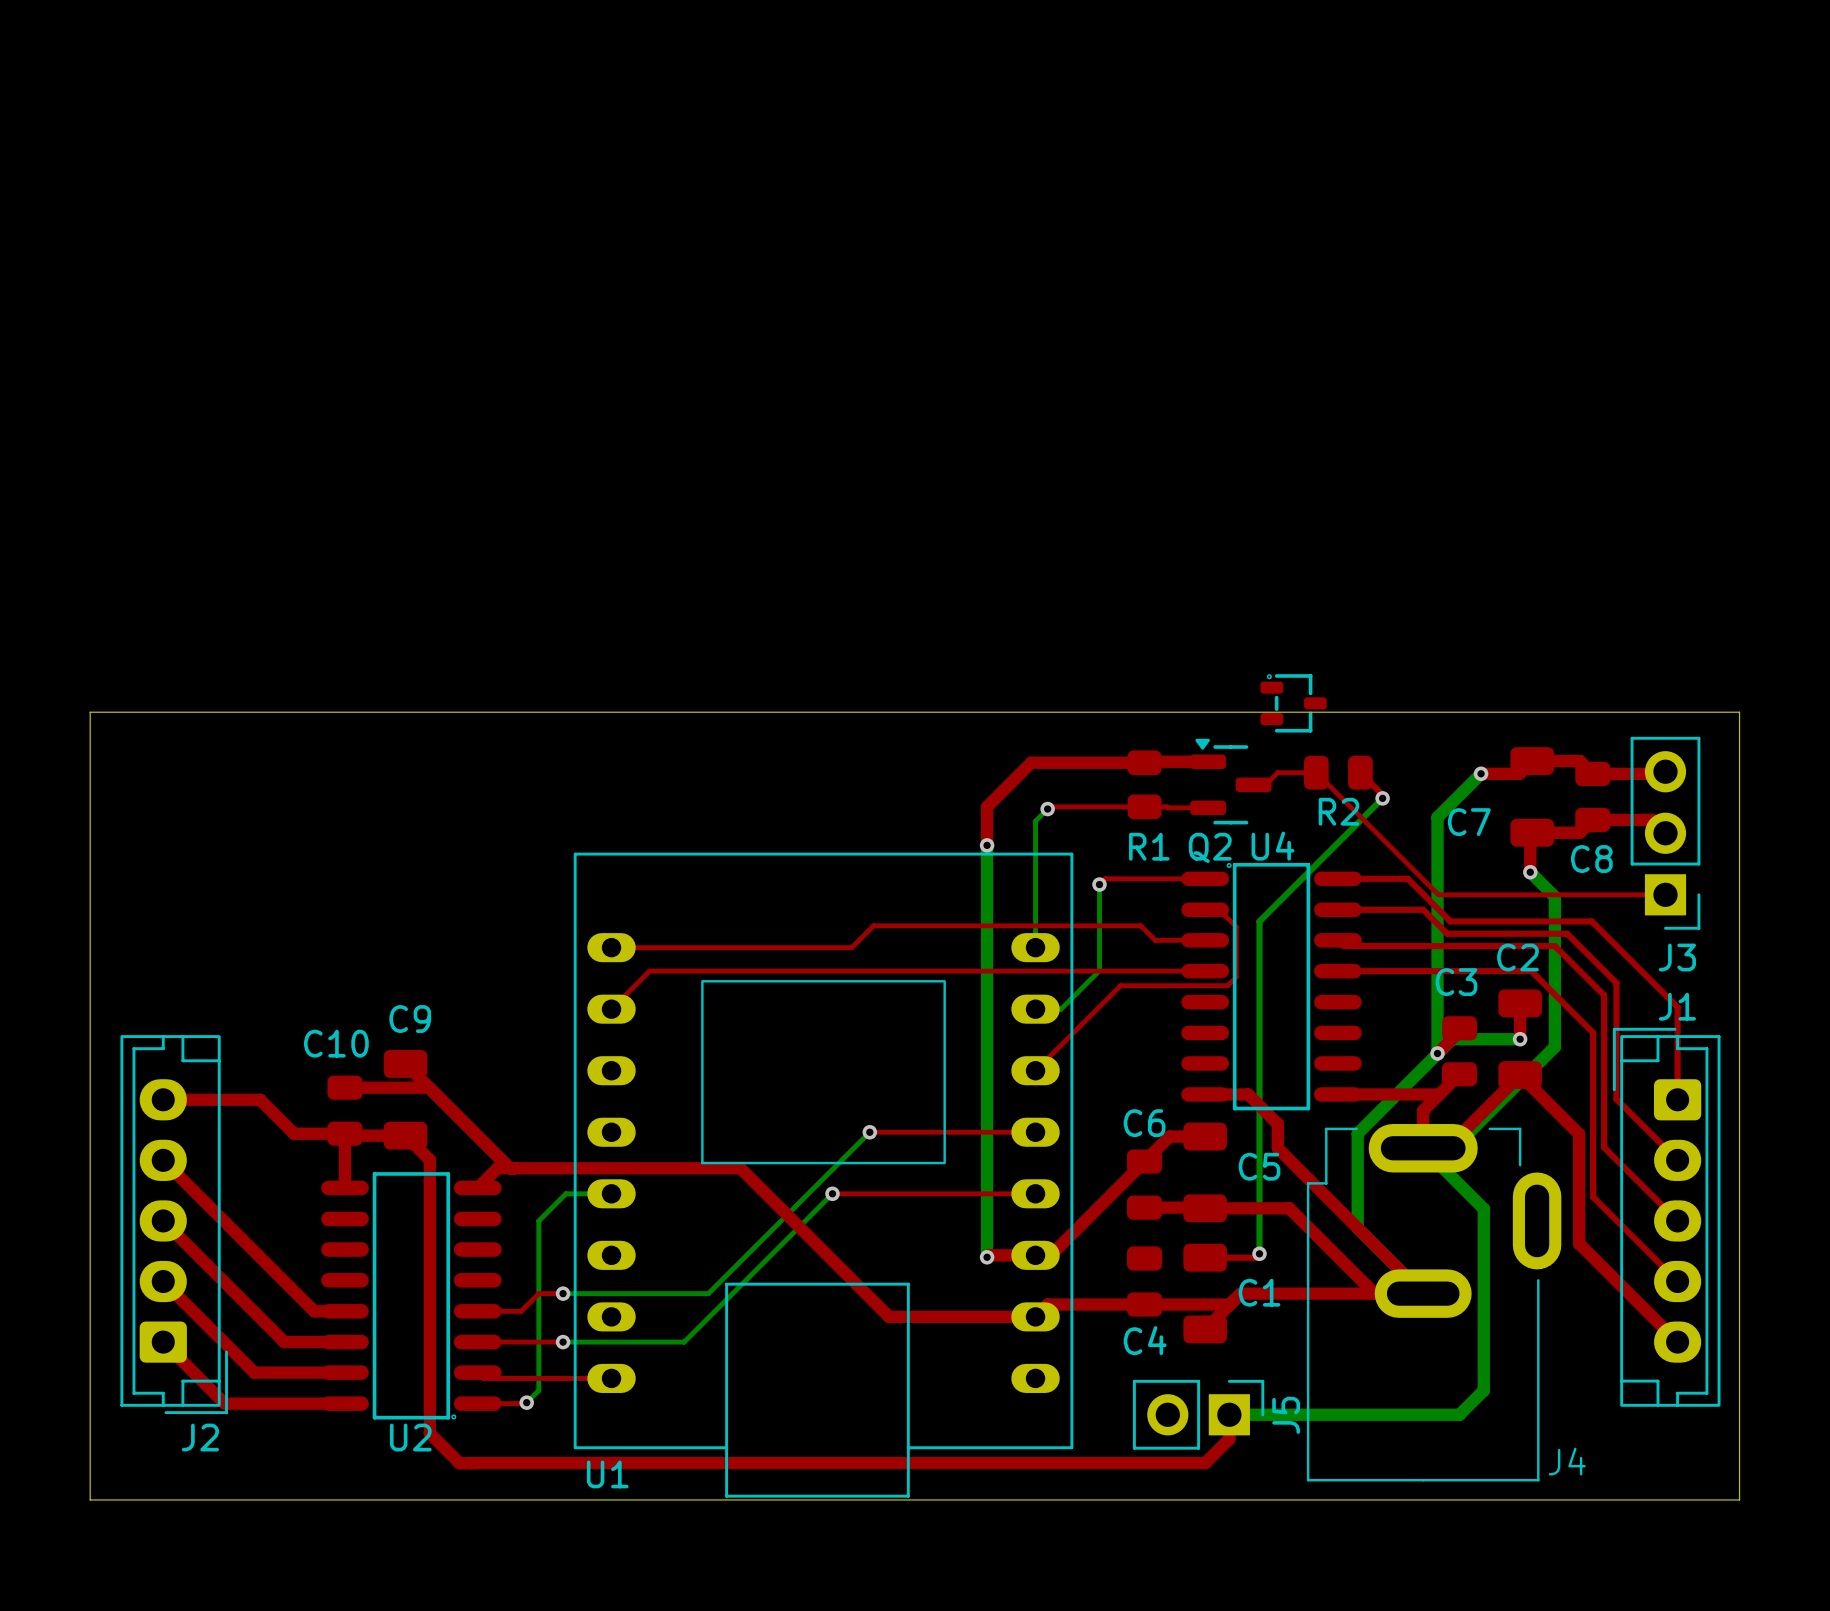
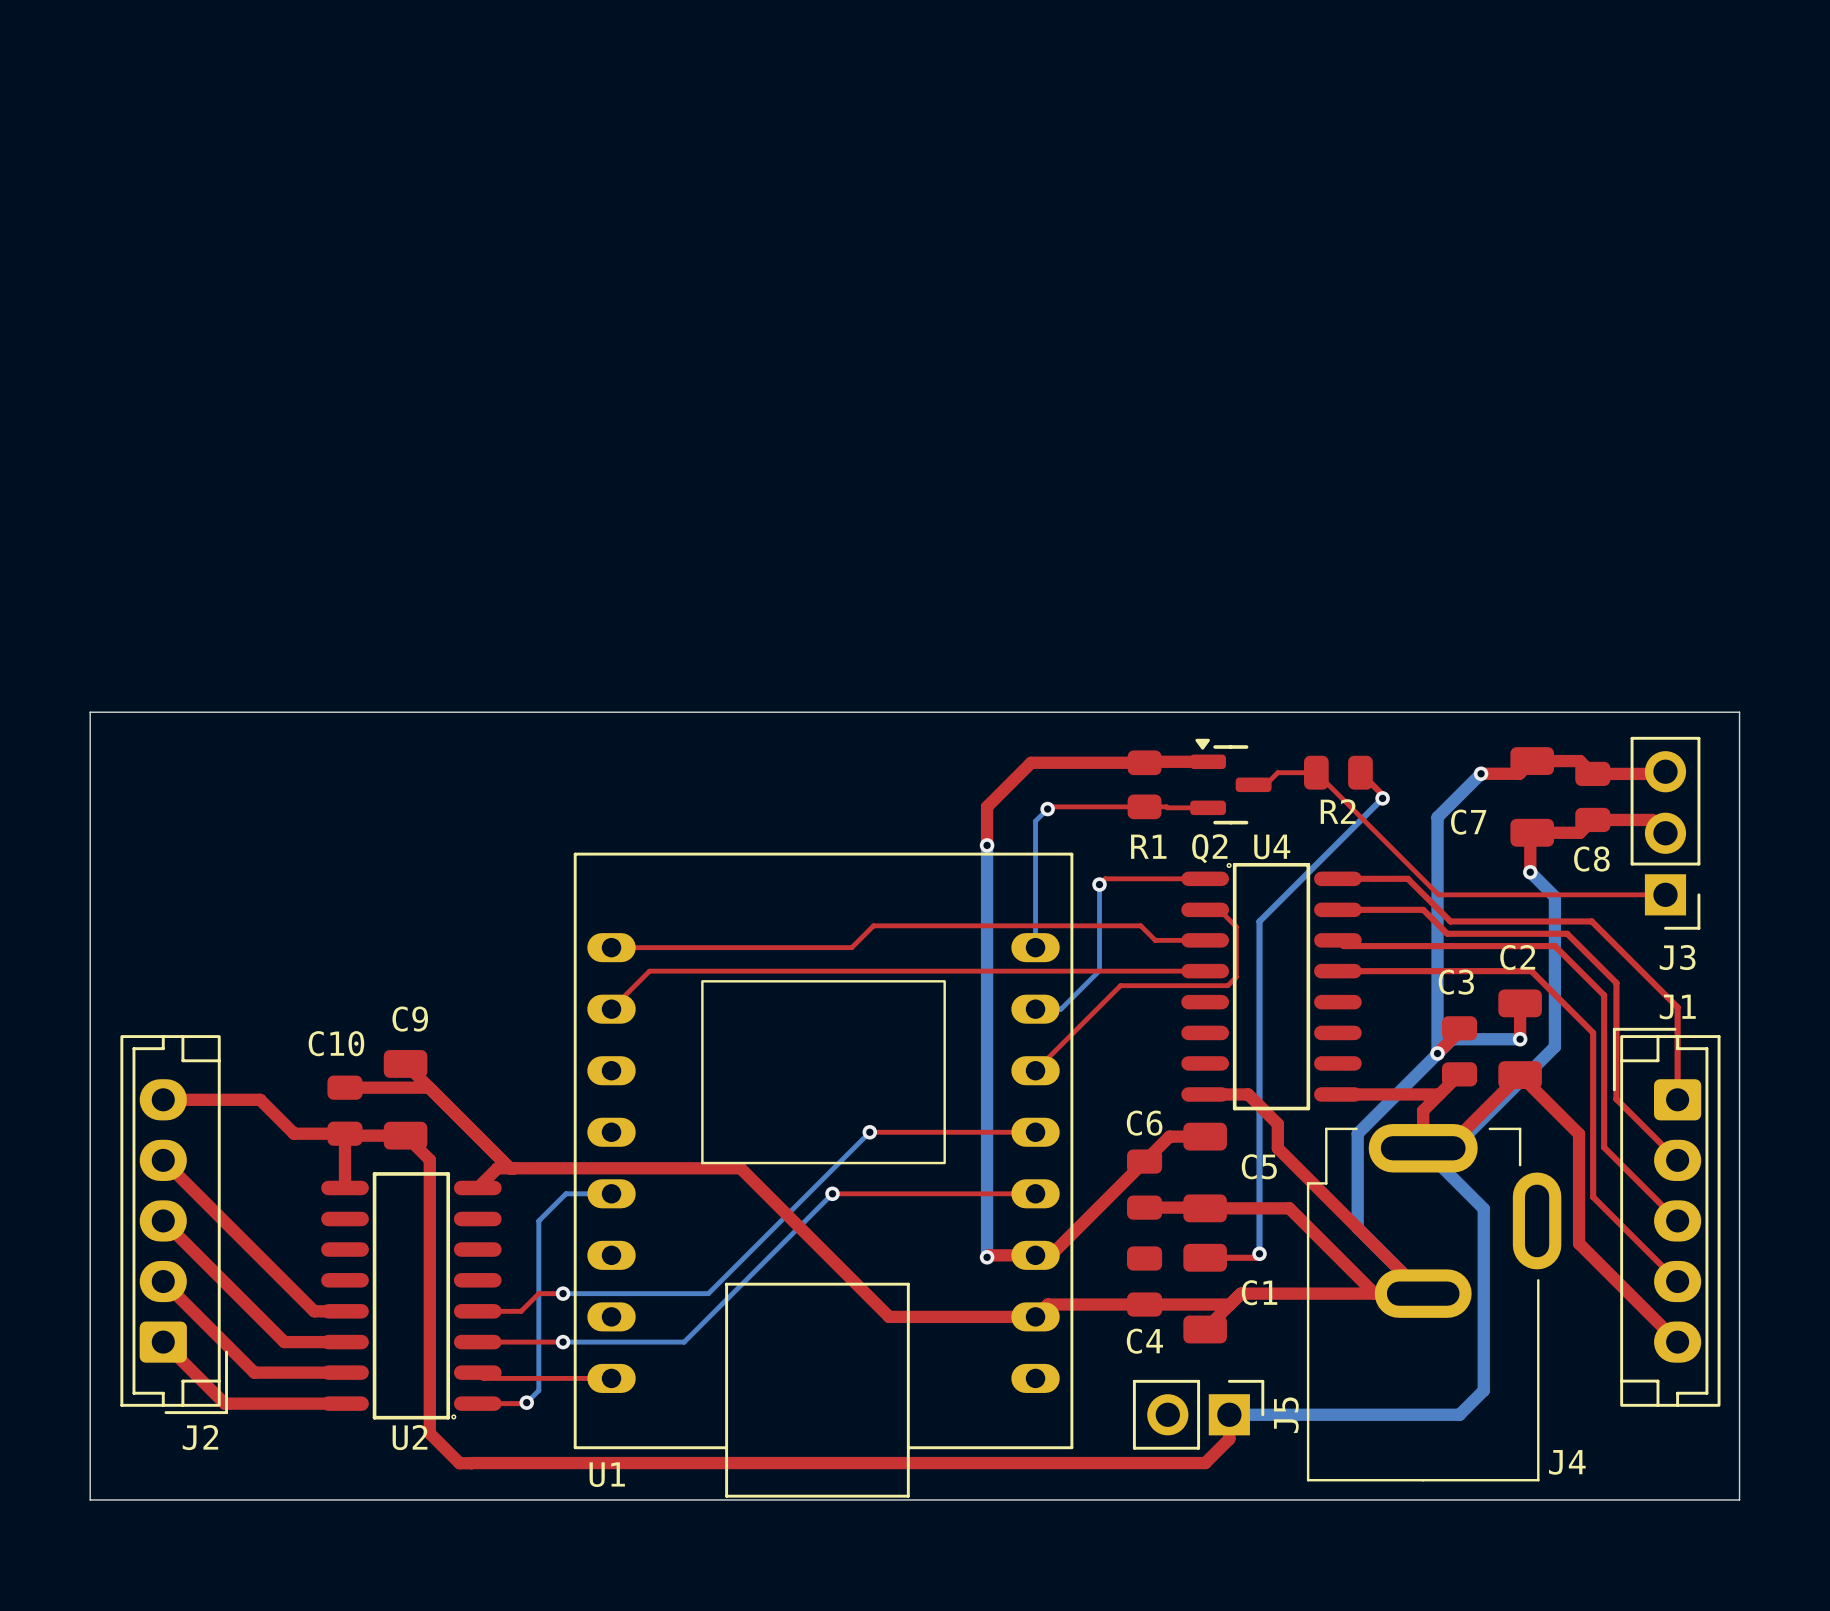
part: (1293, 703) -> none

